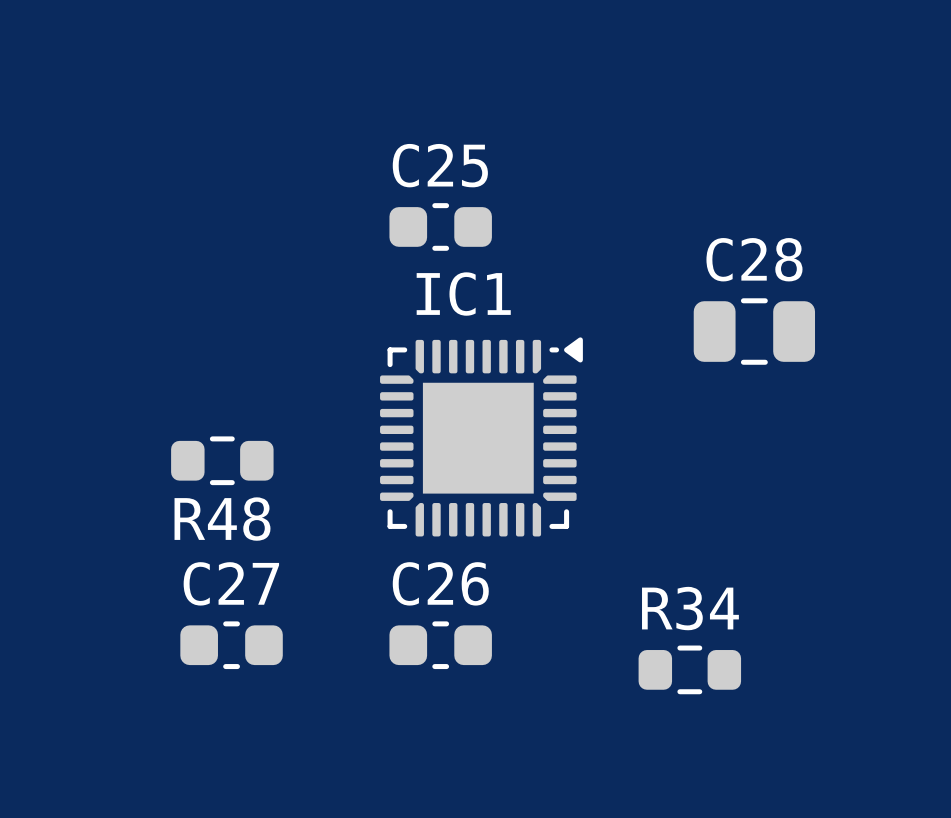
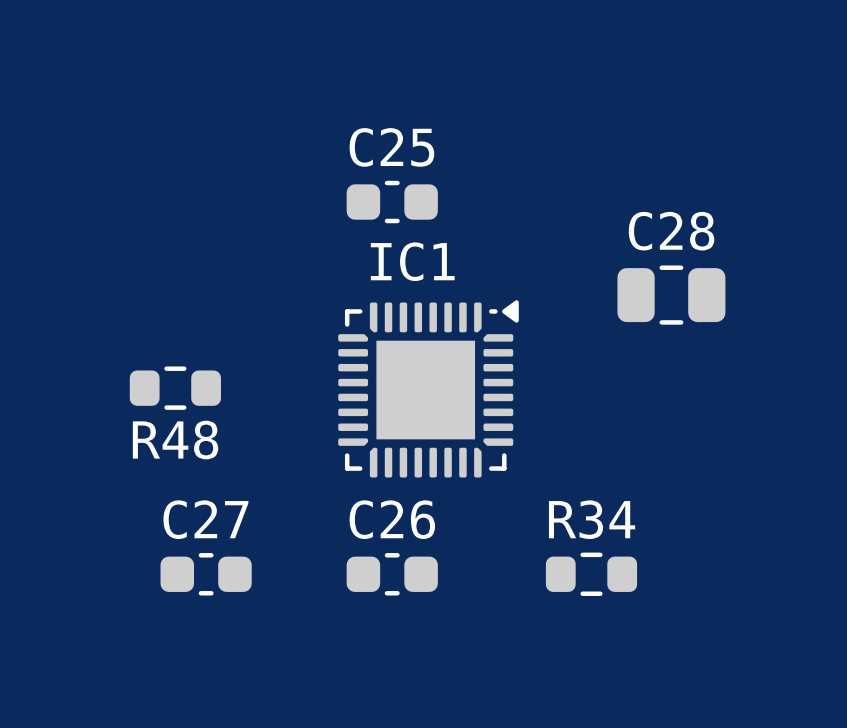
R48 position: (222, 460) -> (175, 388)
R34 position: (689, 669) -> (591, 574)

